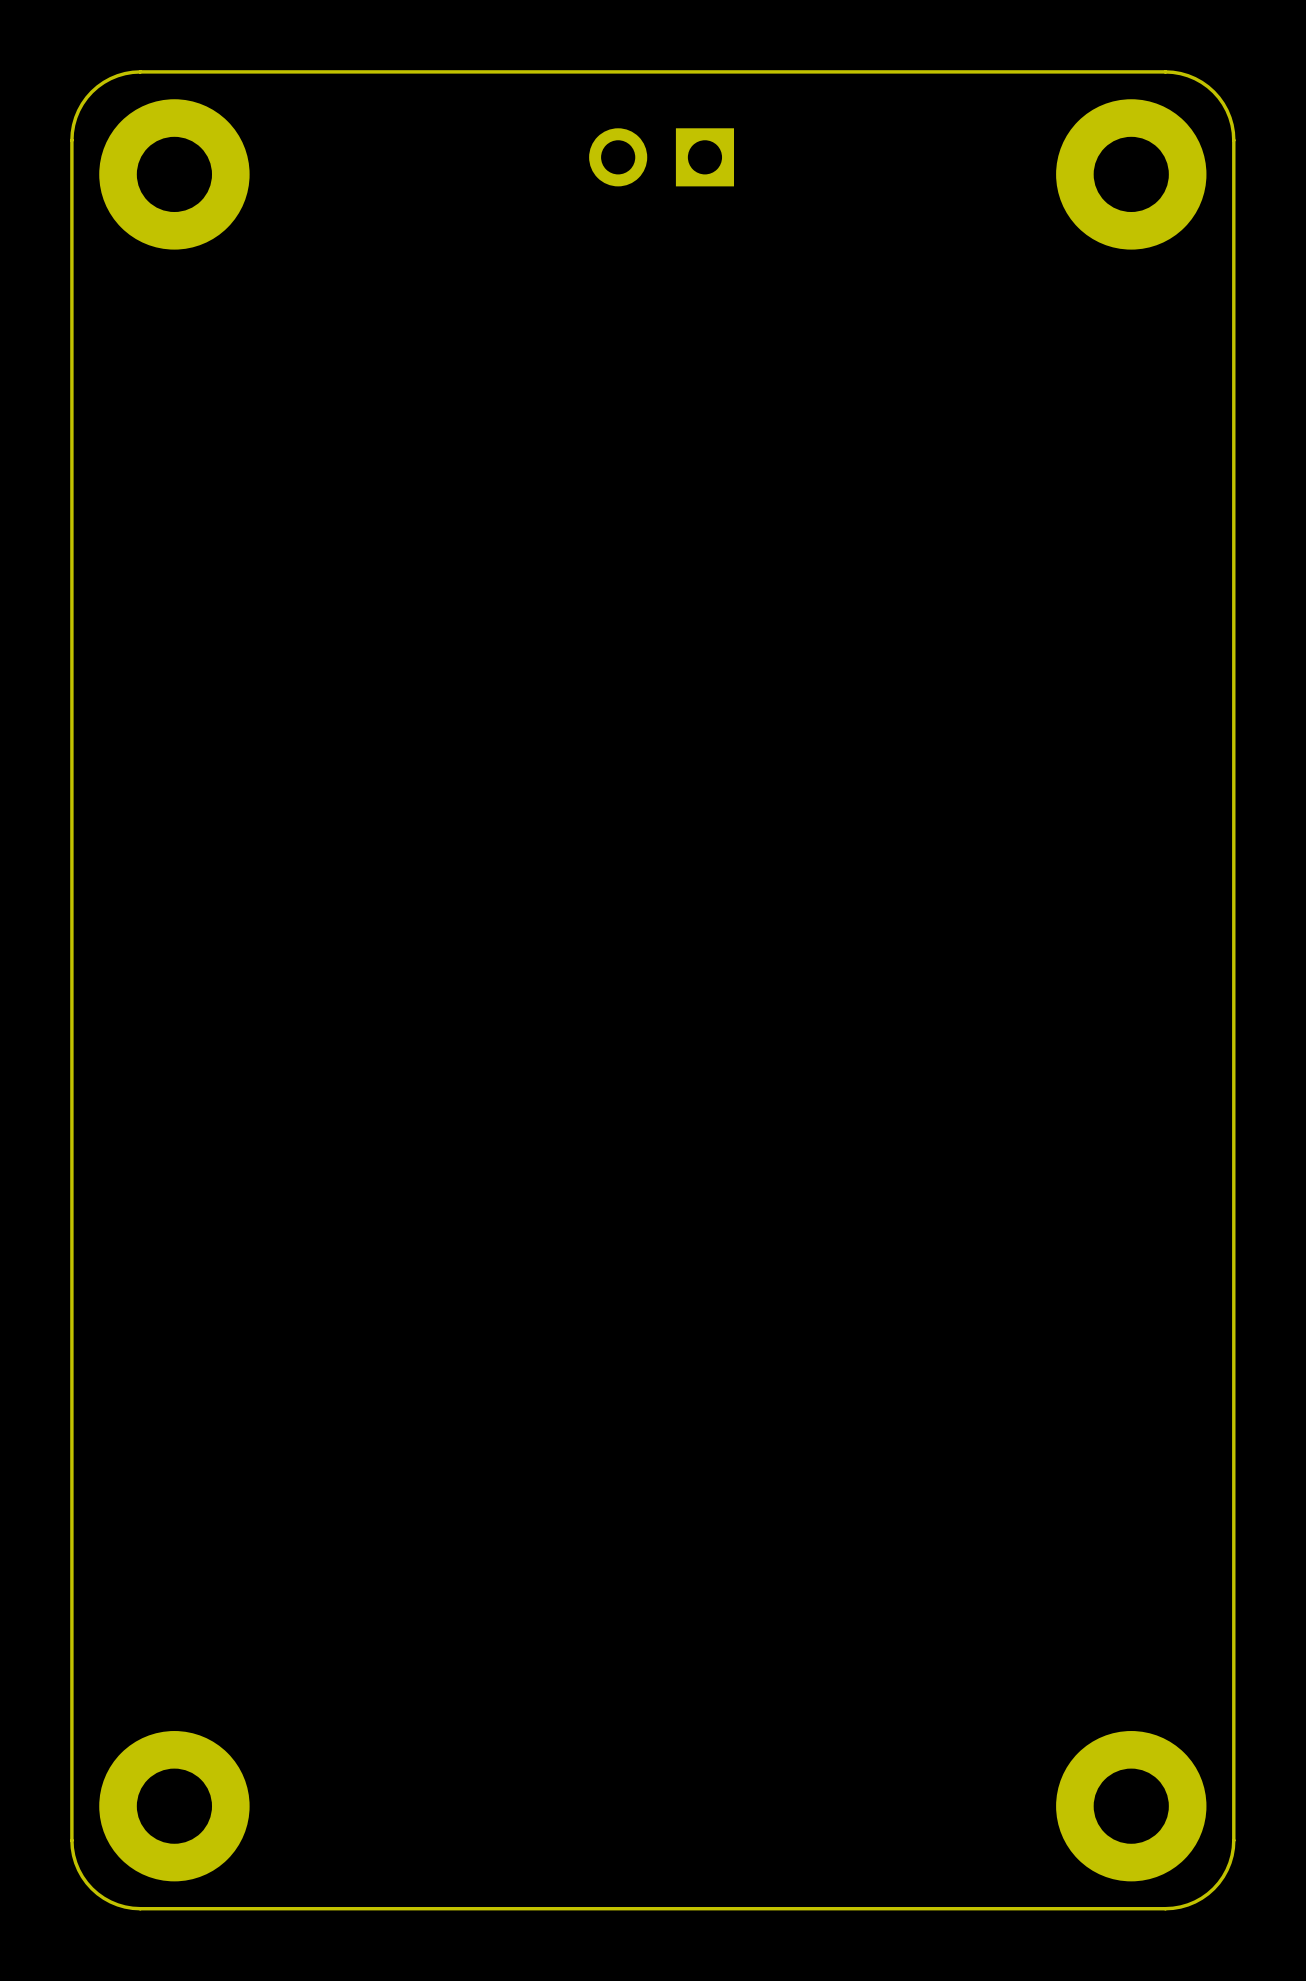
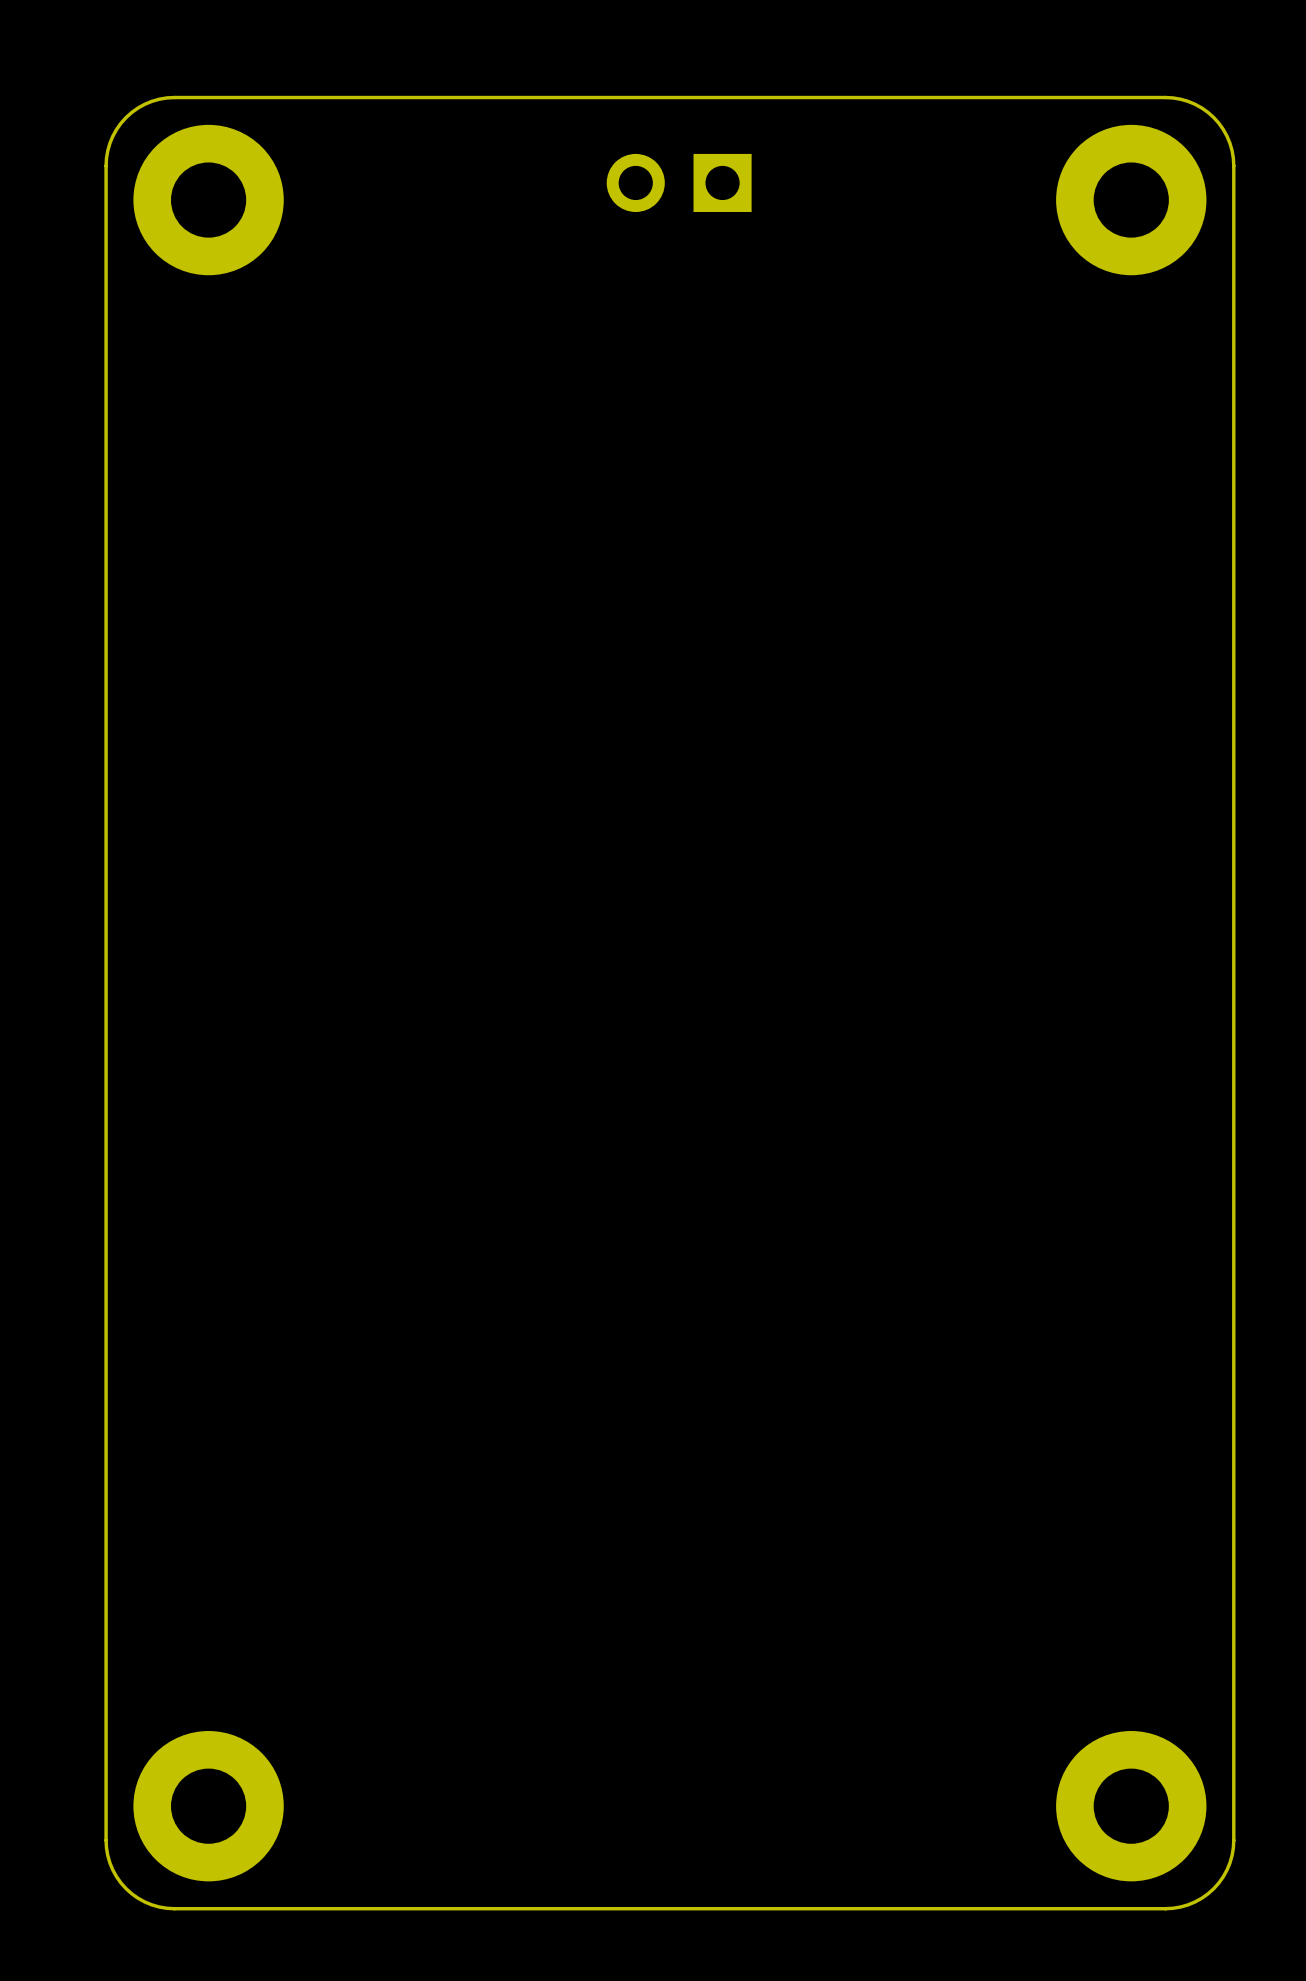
part position: (661, 157) -> (679, 182)
board edge: (1233, 165) (1232, 125) (1227, 110) (1218, 97) (1208, 86) (1195, 78) (1180, 73) (1165, 71) (140, 71) (125, 73) (103, 82) (91, 91) (82, 103) (73, 125) (71, 140) (71, 1840) (73, 1855) (82, 1876) (91, 1888) (103, 1898) (117, 1904) (132, 1908) (174, 1908) -> (1233, 165) (1229, 143) (1223, 129) (1213, 117) (1195, 104) (1180, 99) (1165, 97) (174, 97) (159, 99) (144, 104) (131, 112) (116, 129) (109, 143) (106, 165) (106, 1840) (107, 1855) (112, 1870) (126, 1888) (144, 1901) (159, 1907) (174, 1908)
part position: (174, 174) -> (208, 200)
part position: (1131, 174) -> (1131, 200)
part position: (174, 1806) -> (208, 1806)

